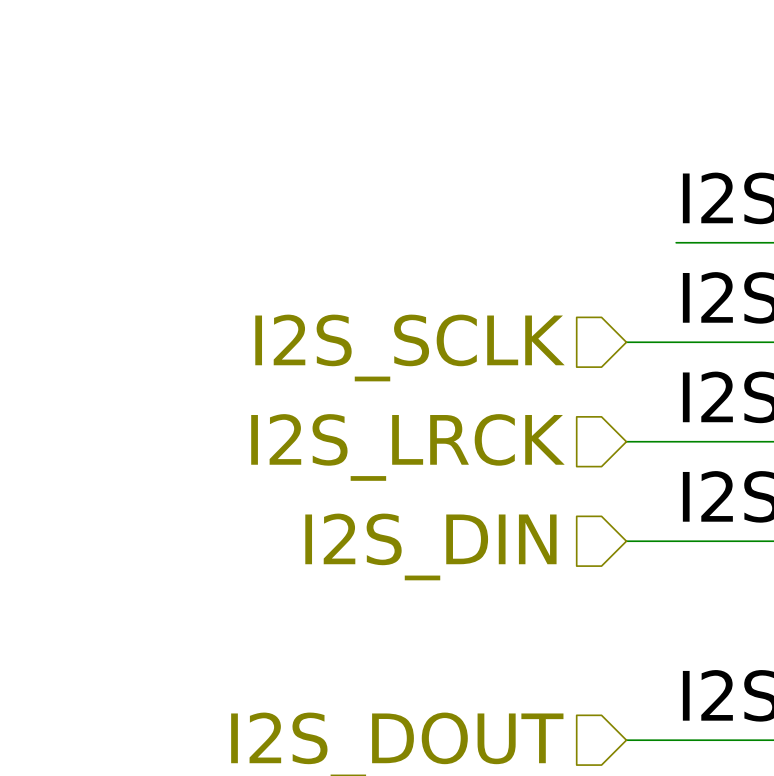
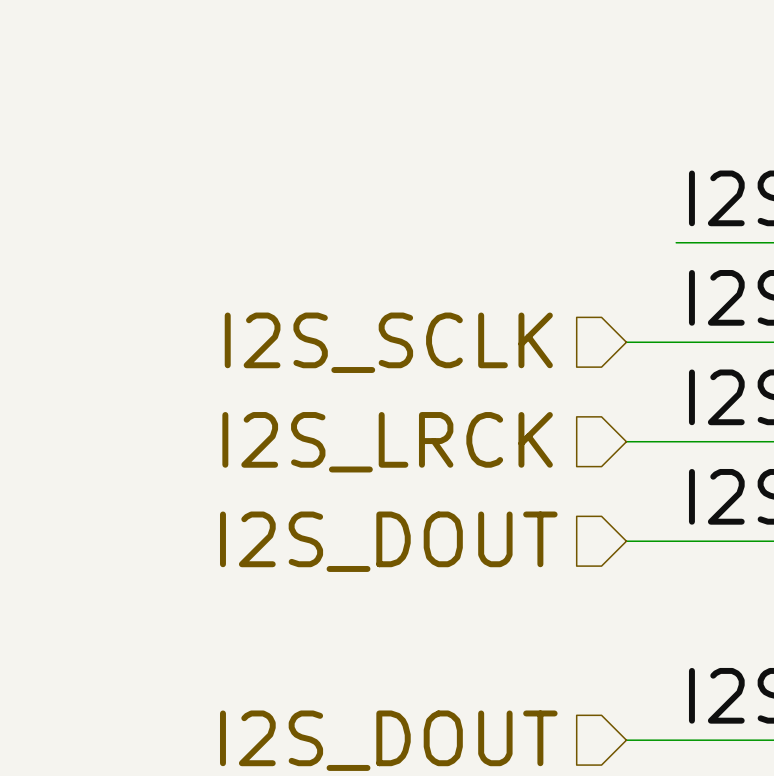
hierarchical label: I2S_DIN (430, 546) -> I2S_DOUT (388, 541)

